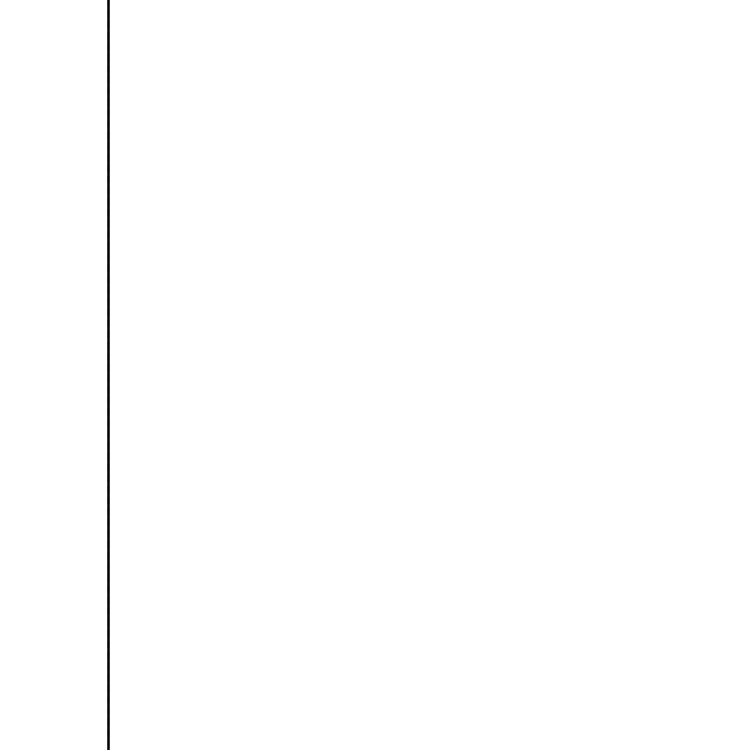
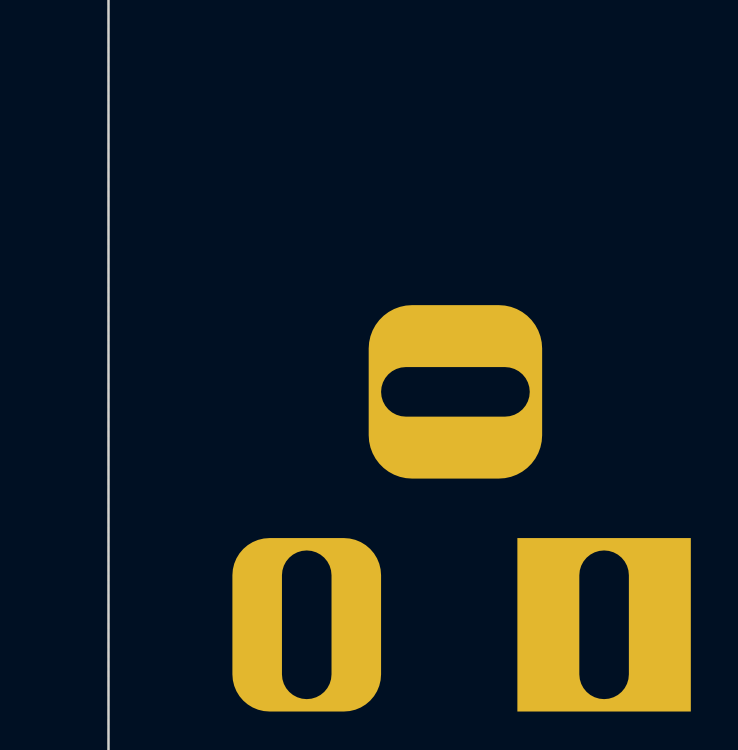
part: none -> (461, 508)

